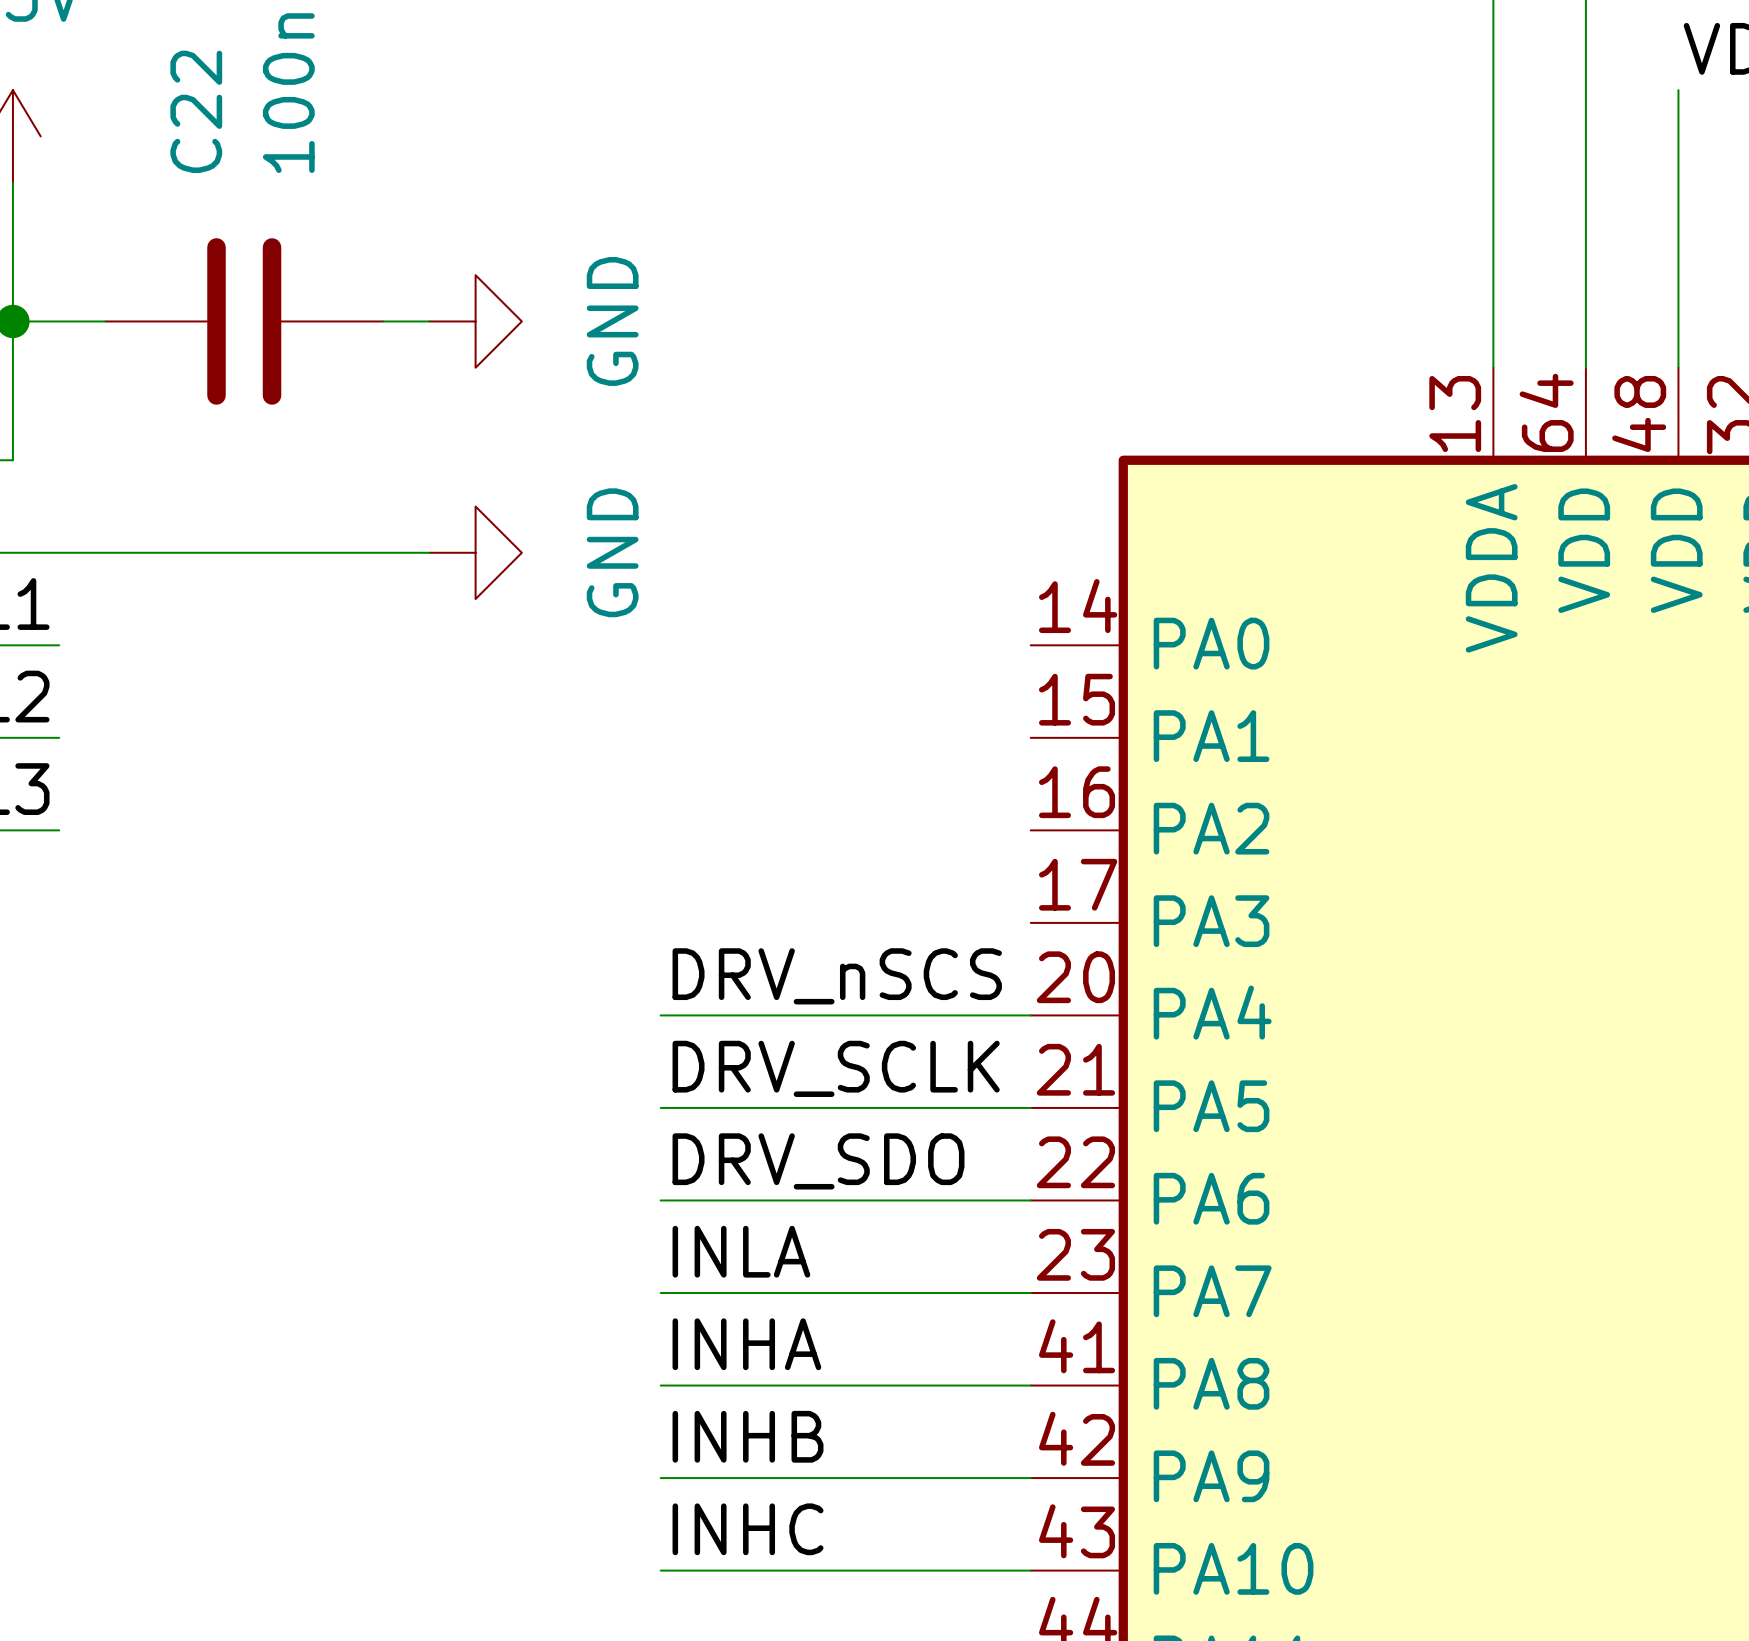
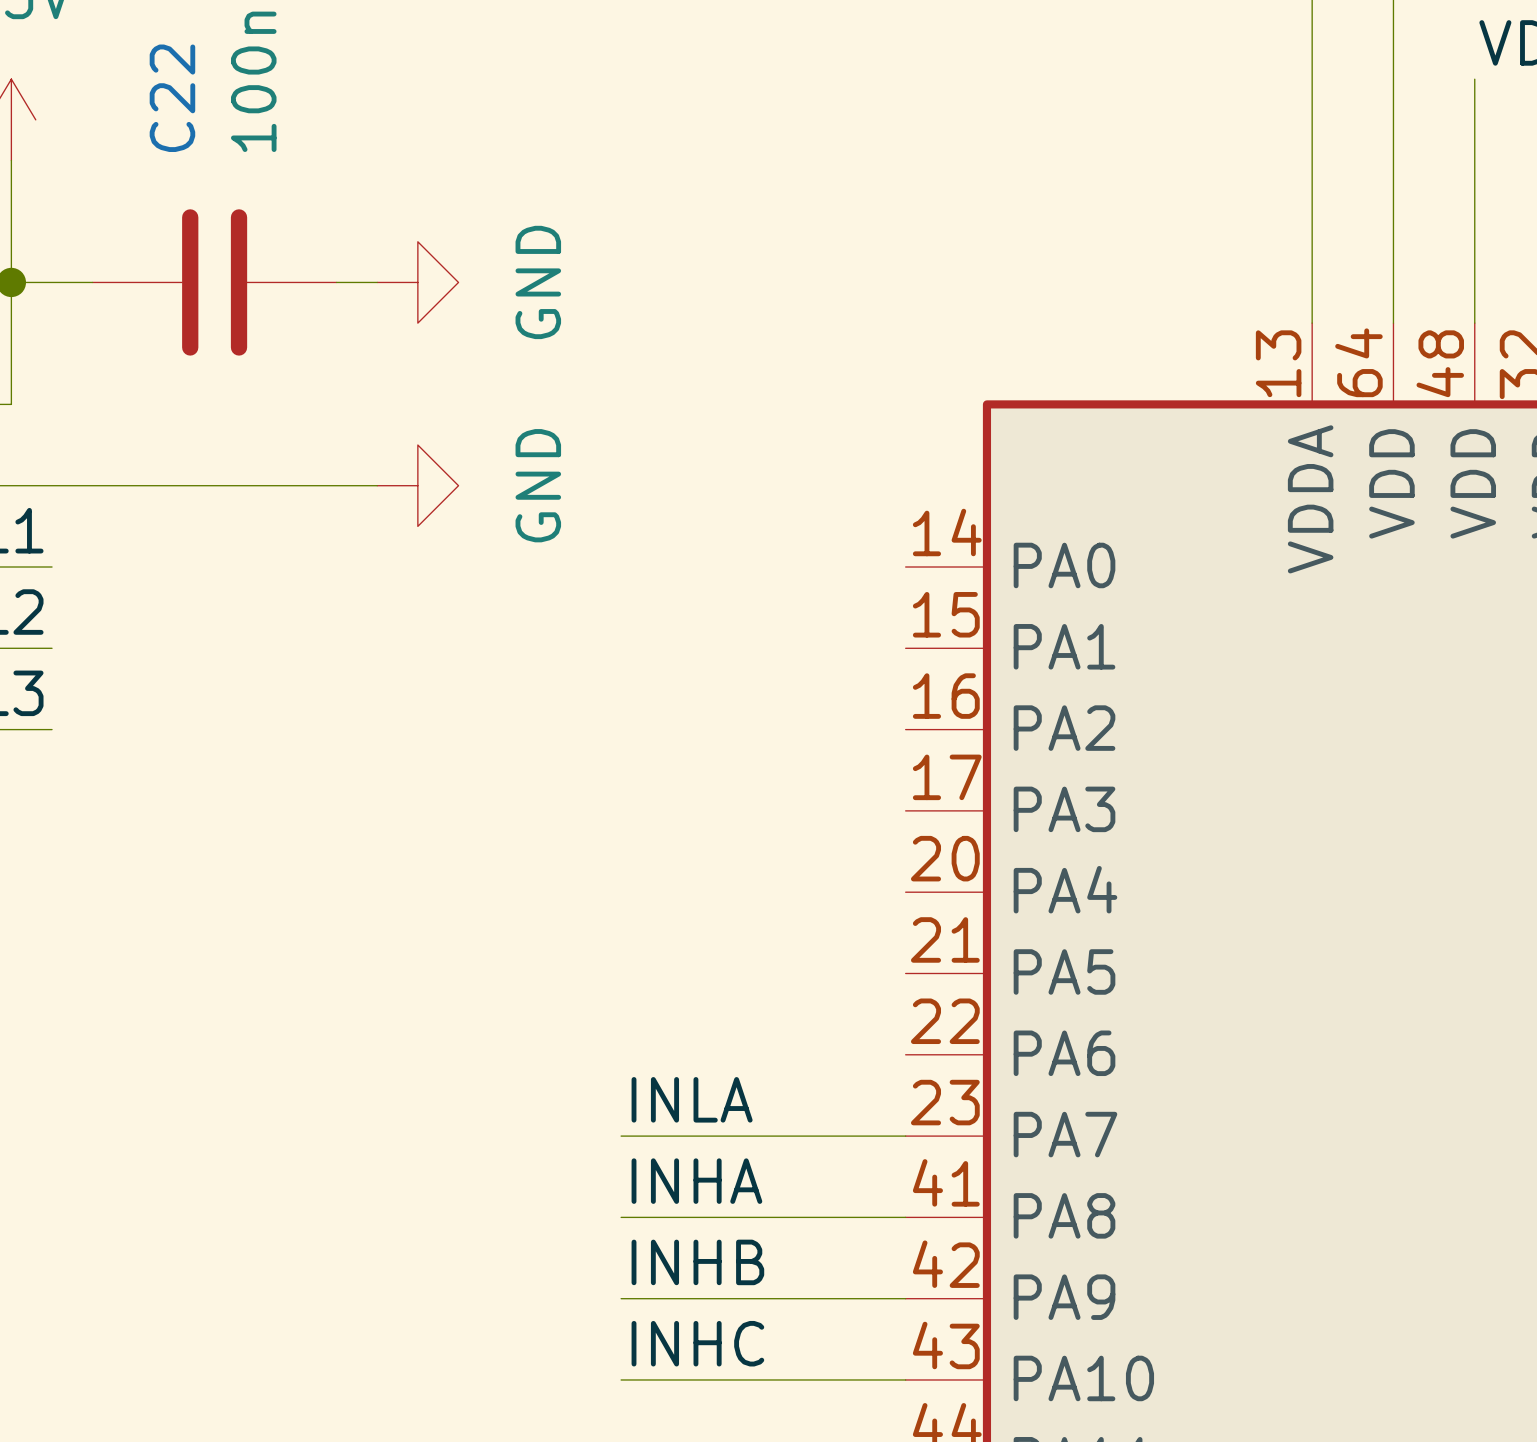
label: DRV_nSCS (837, 976) -> none
wire: (660, 1015) (1030, 1015) -> none
label: DRV_SCLK (836, 1068) -> none
wire: (660, 1107) (1030, 1107) -> none
label: DRV_SDO (818, 1161) -> none
wire: (660, 1200) (1030, 1200) -> none
label position: INLA (741, 1251) -> INLA (692, 1099)
wire: (660, 1293) (706, 1293) -> none
label position: INHA (746, 1344) -> INHA (696, 1181)
wire: (660, 1385) (706, 1385) -> none
label position: INHB (748, 1436) -> INHB (697, 1262)
wire: (660, 1478) (706, 1478) -> none
label position: INHC (748, 1529) -> INHC (697, 1343)
wire: (660, 1570) (706, 1570) -> none

